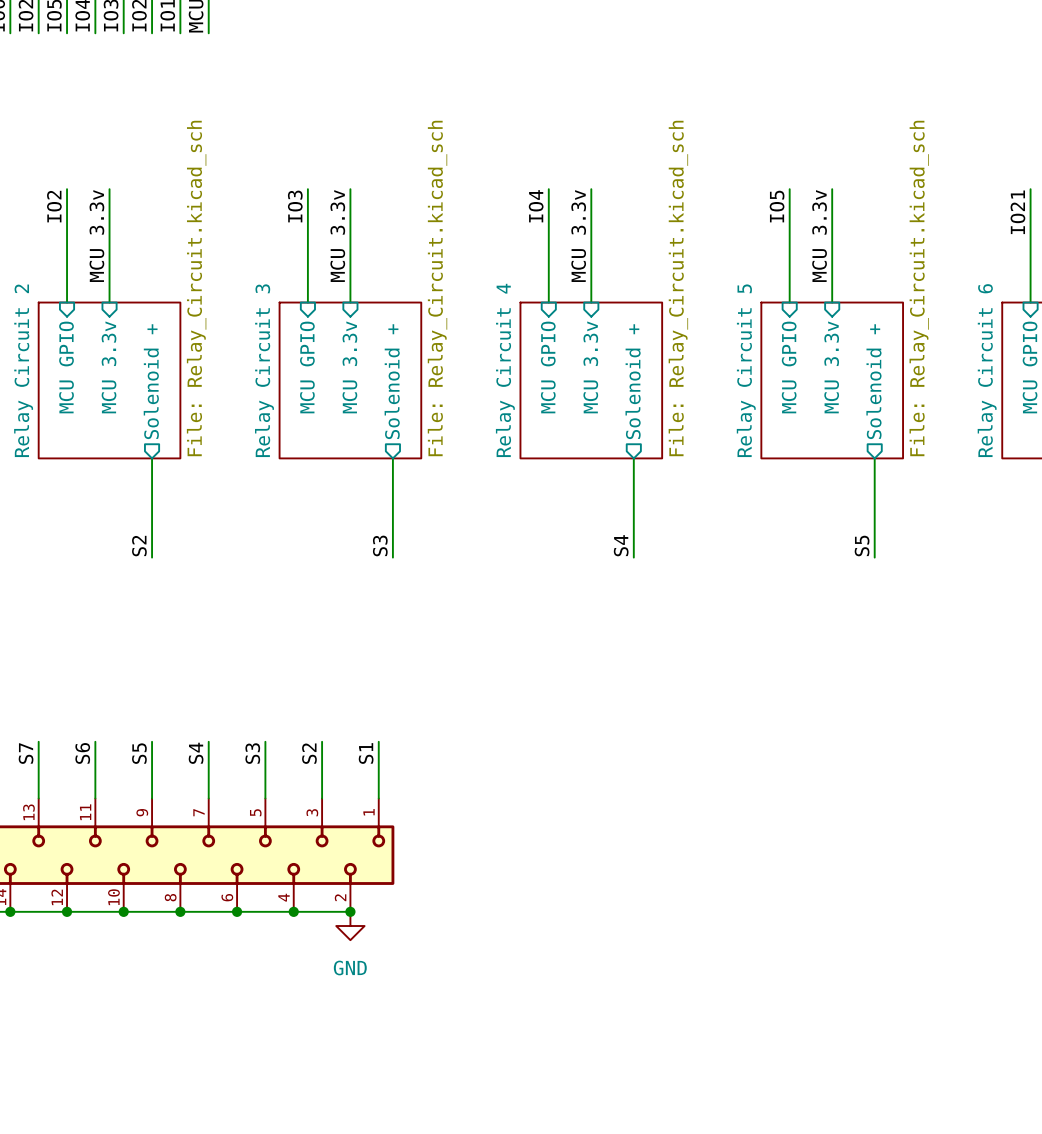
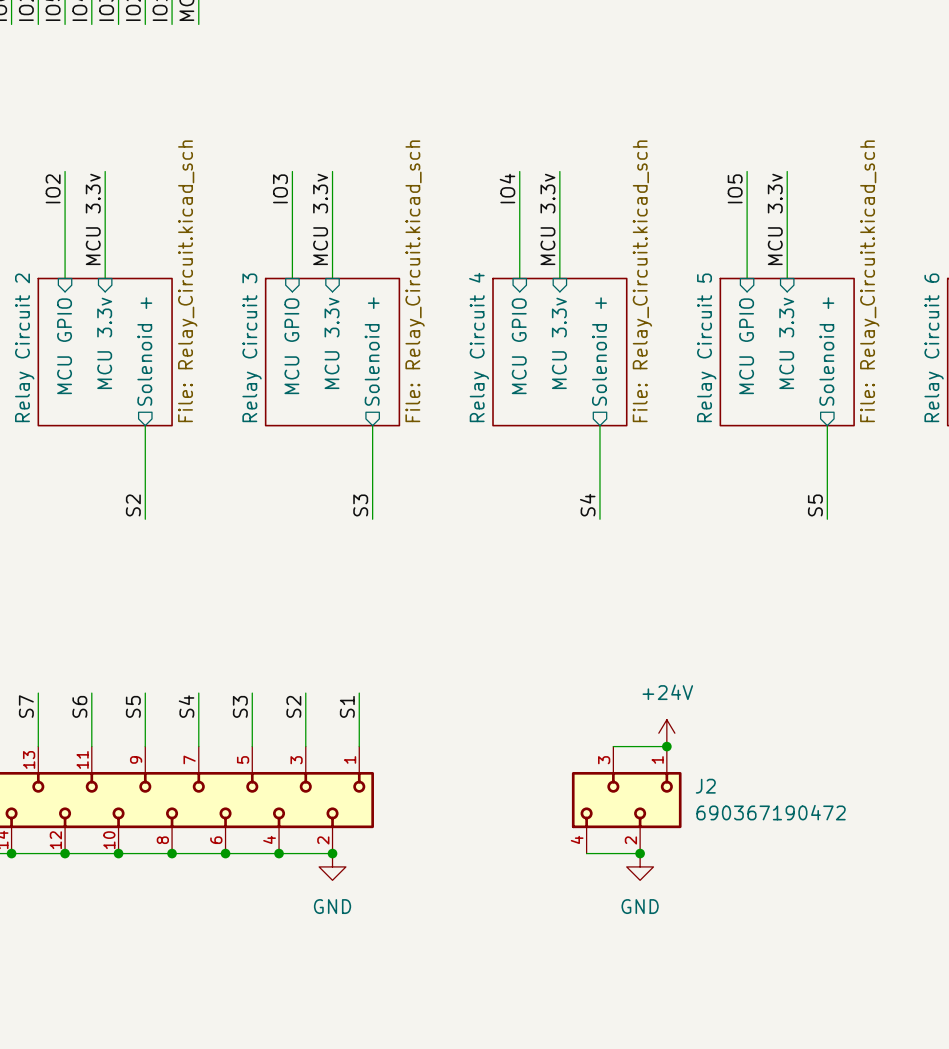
power symbol: none -> +24V (666, 733)
wire: none -> (613, 746) (666, 746)
junction: none -> (666, 746)
J2: none -> 690367190472 (626, 800)
wire: none -> (586, 853) (640, 853)
junction: none -> (640, 853)
power symbol: none -> GND (640, 866)

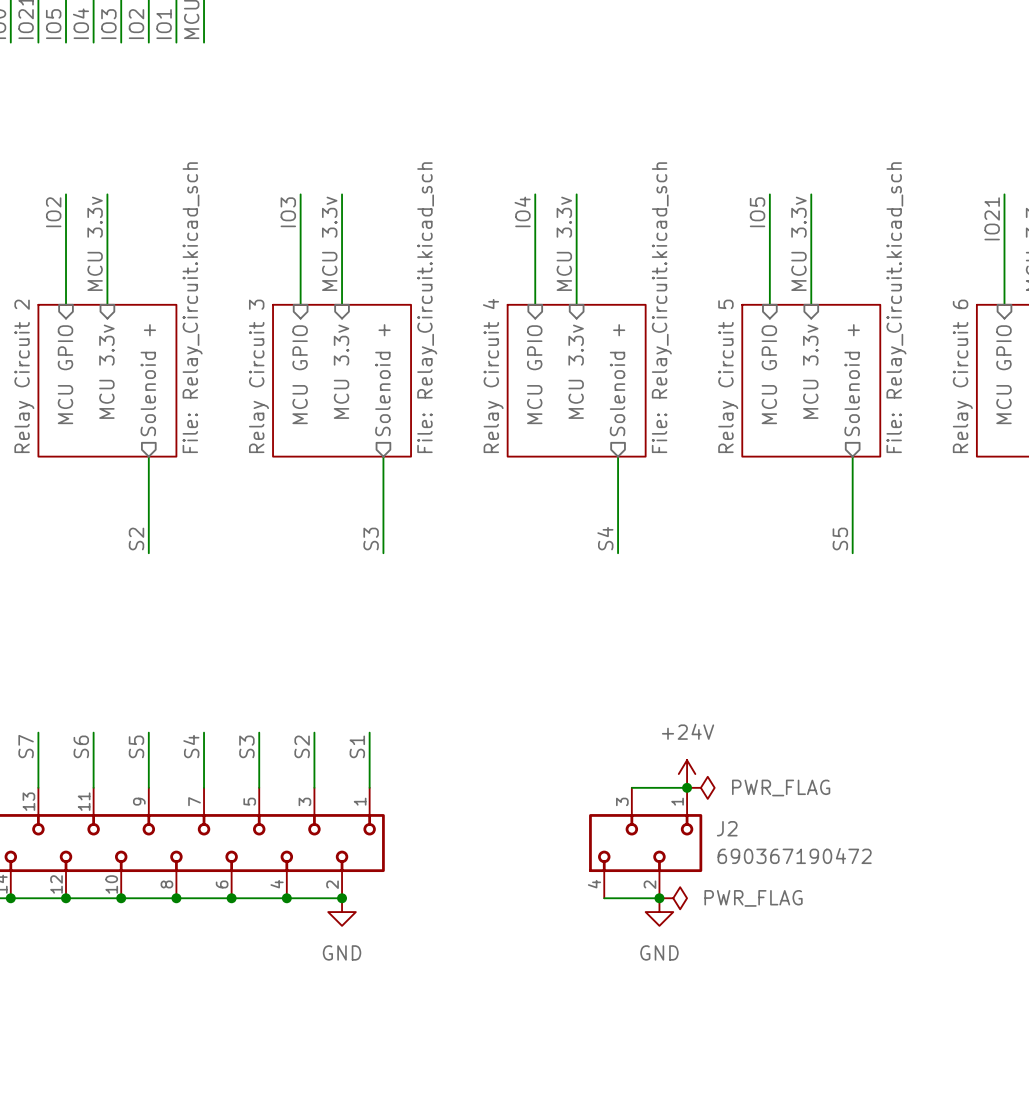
power symbol: none -> PWR_FLAG (700, 787)
power symbol: none -> PWR_FLAG (673, 898)

